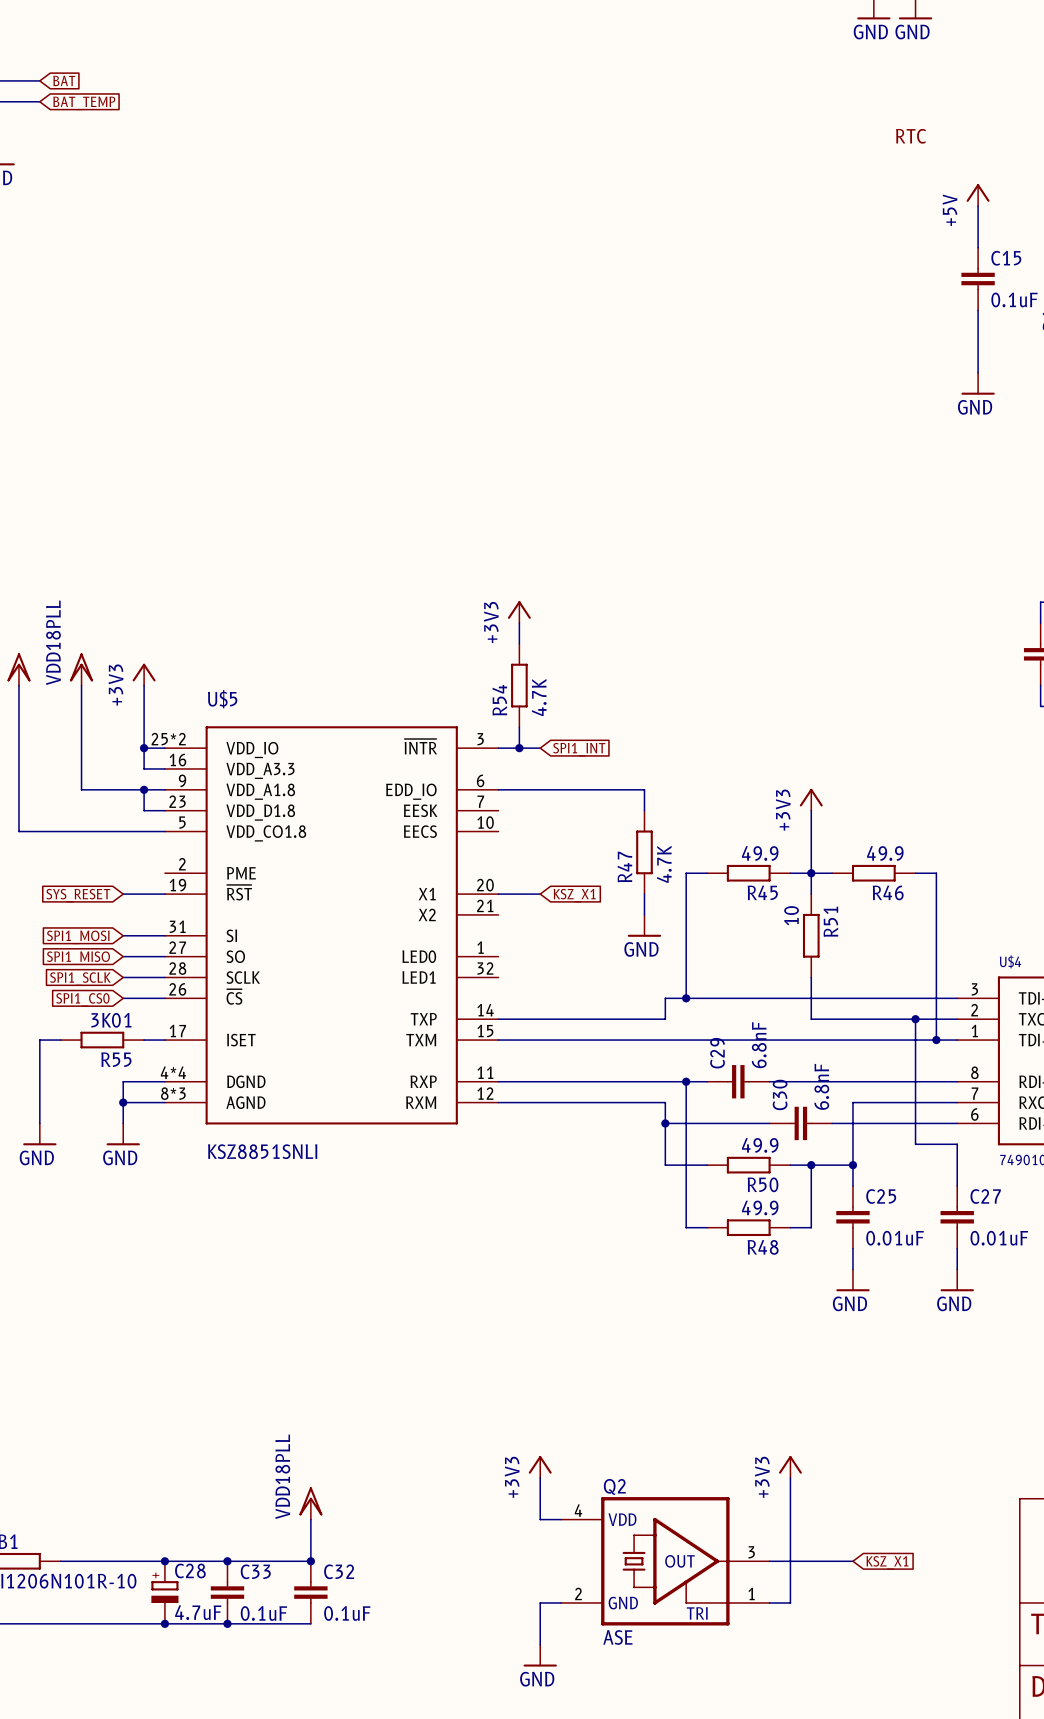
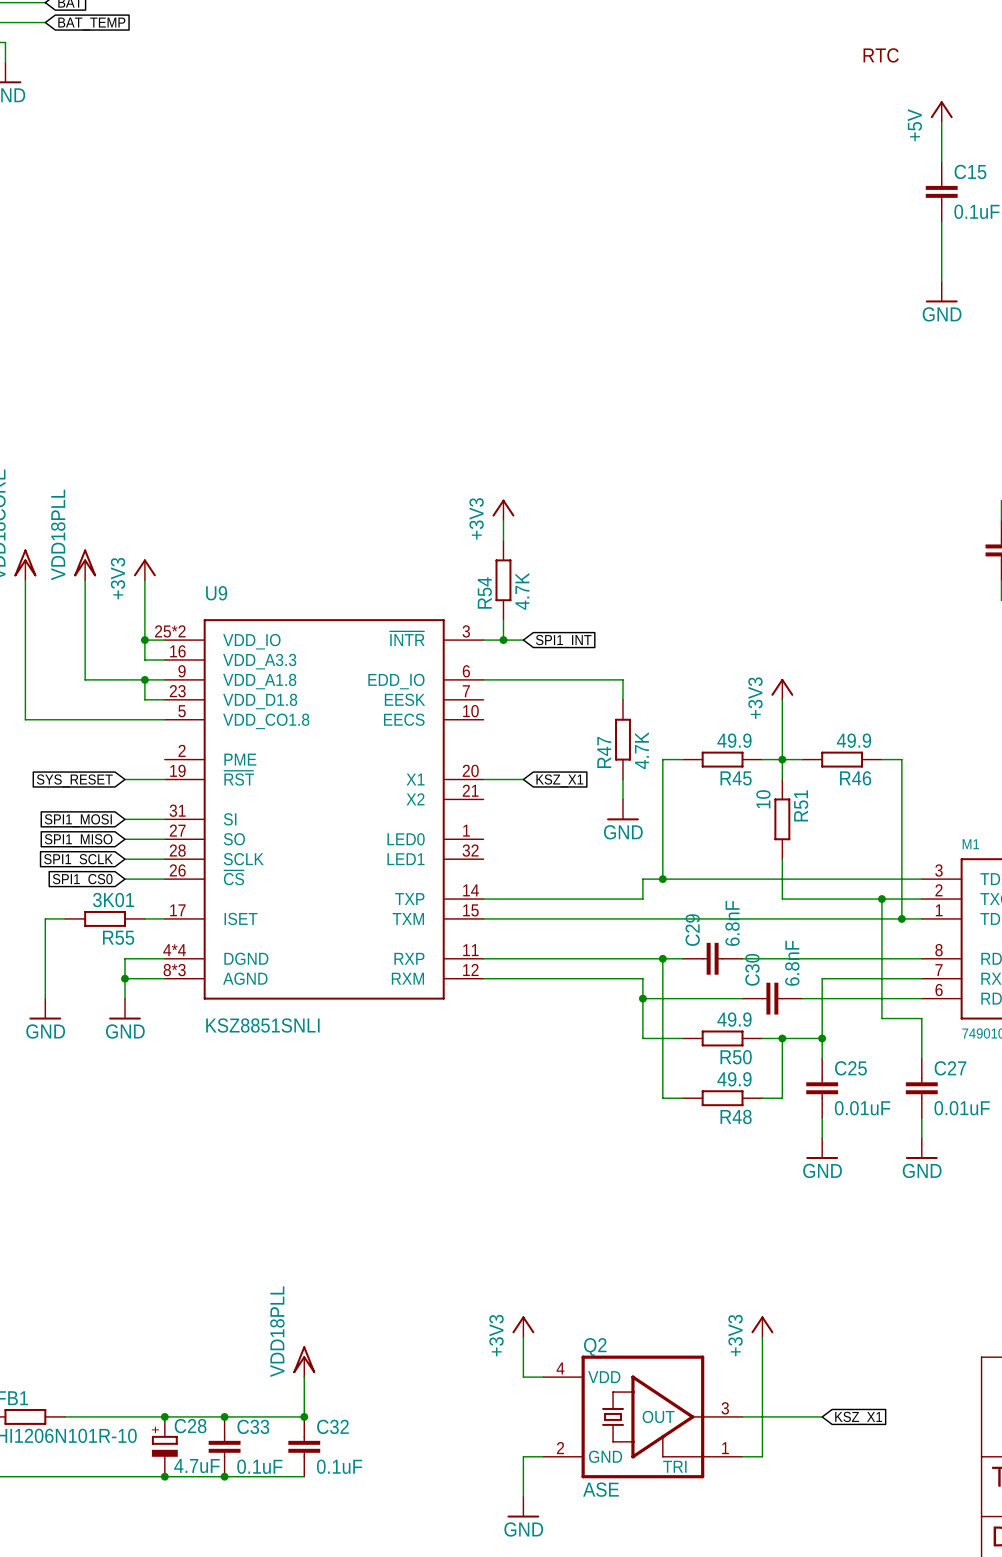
U$5 name: U$5 (222, 699) -> U9 (216, 593)
U$4 name: U$4 (1010, 961) -> M1 (970, 844)

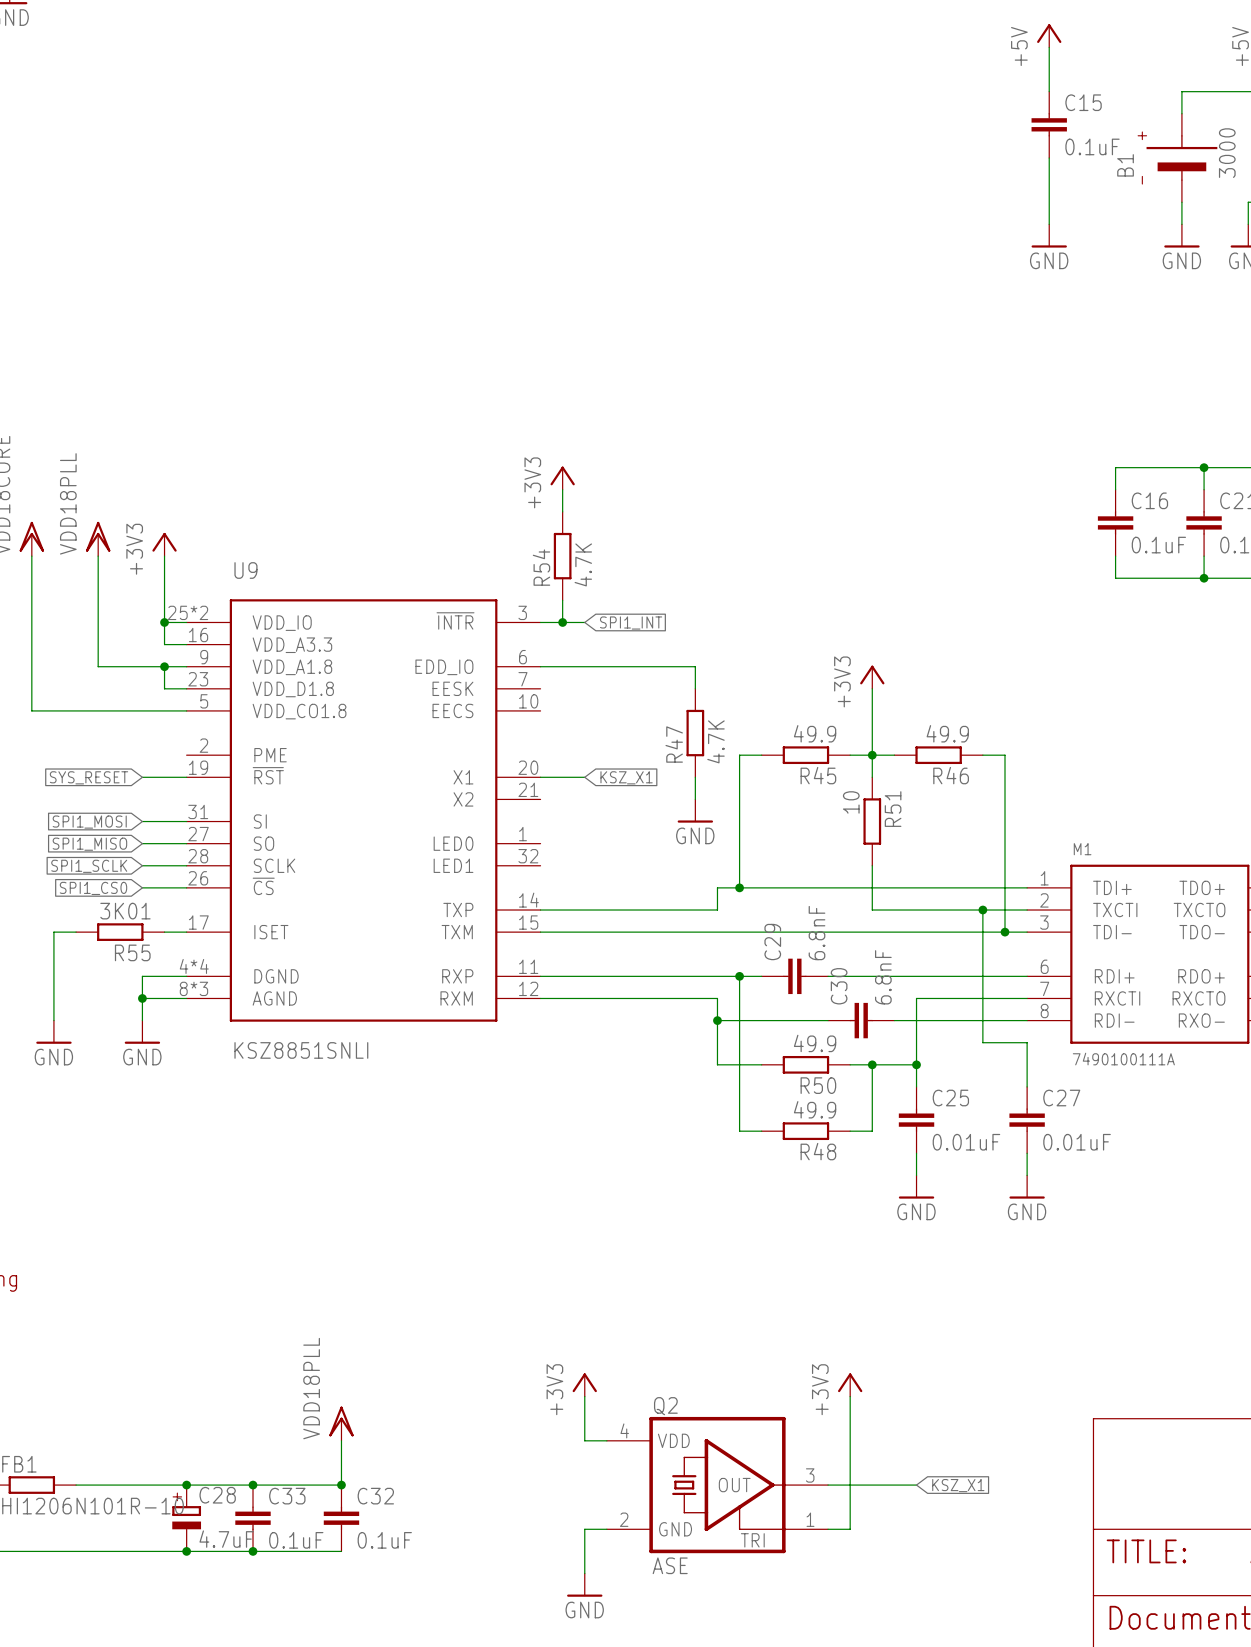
M1 pin number: 3 (938, 870) -> 1 (1044, 878)
M1 pin number: 1 (939, 910) -> 3 (1044, 922)
M1 pin number: 8 (939, 950) -> 6 (1044, 966)
M1 pin number: 6 (939, 990) -> 8 (1044, 1011)

